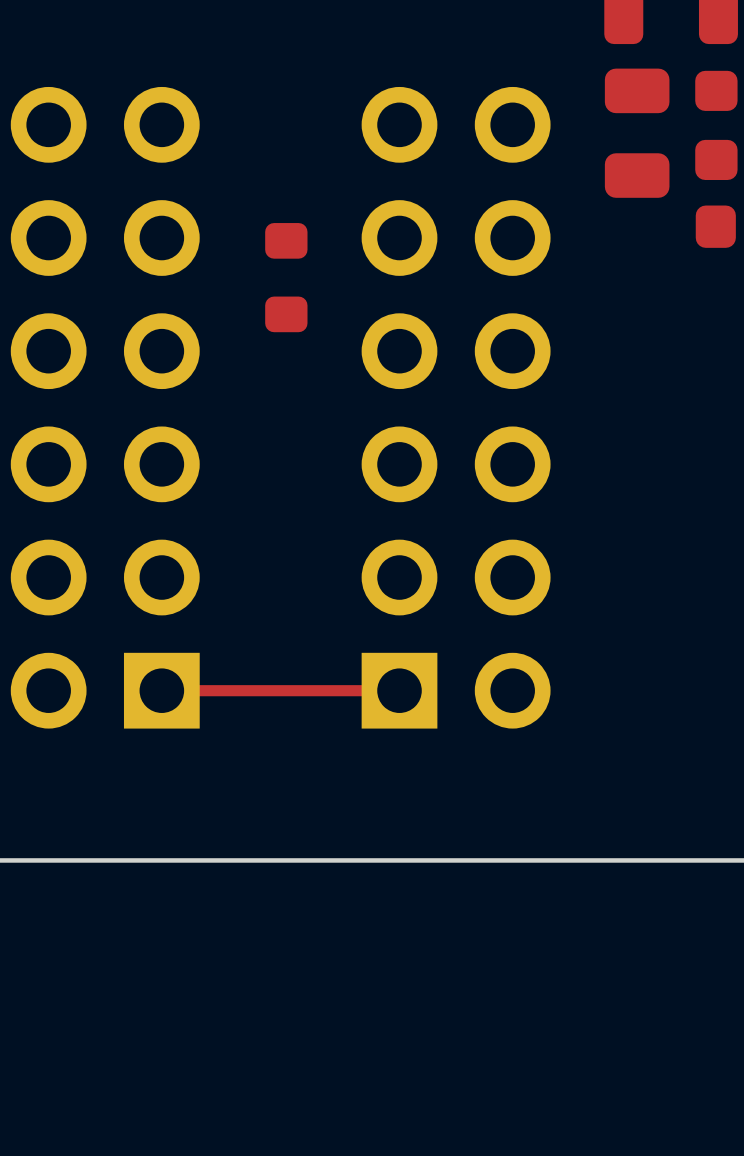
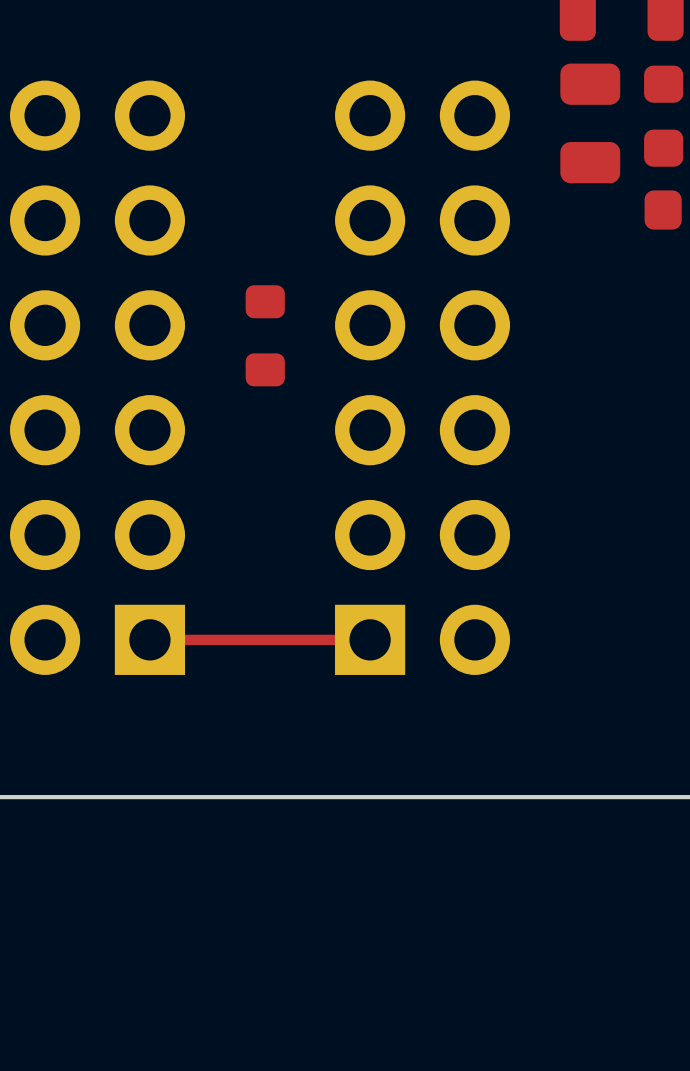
part position: (286, 277) -> (265, 335)

